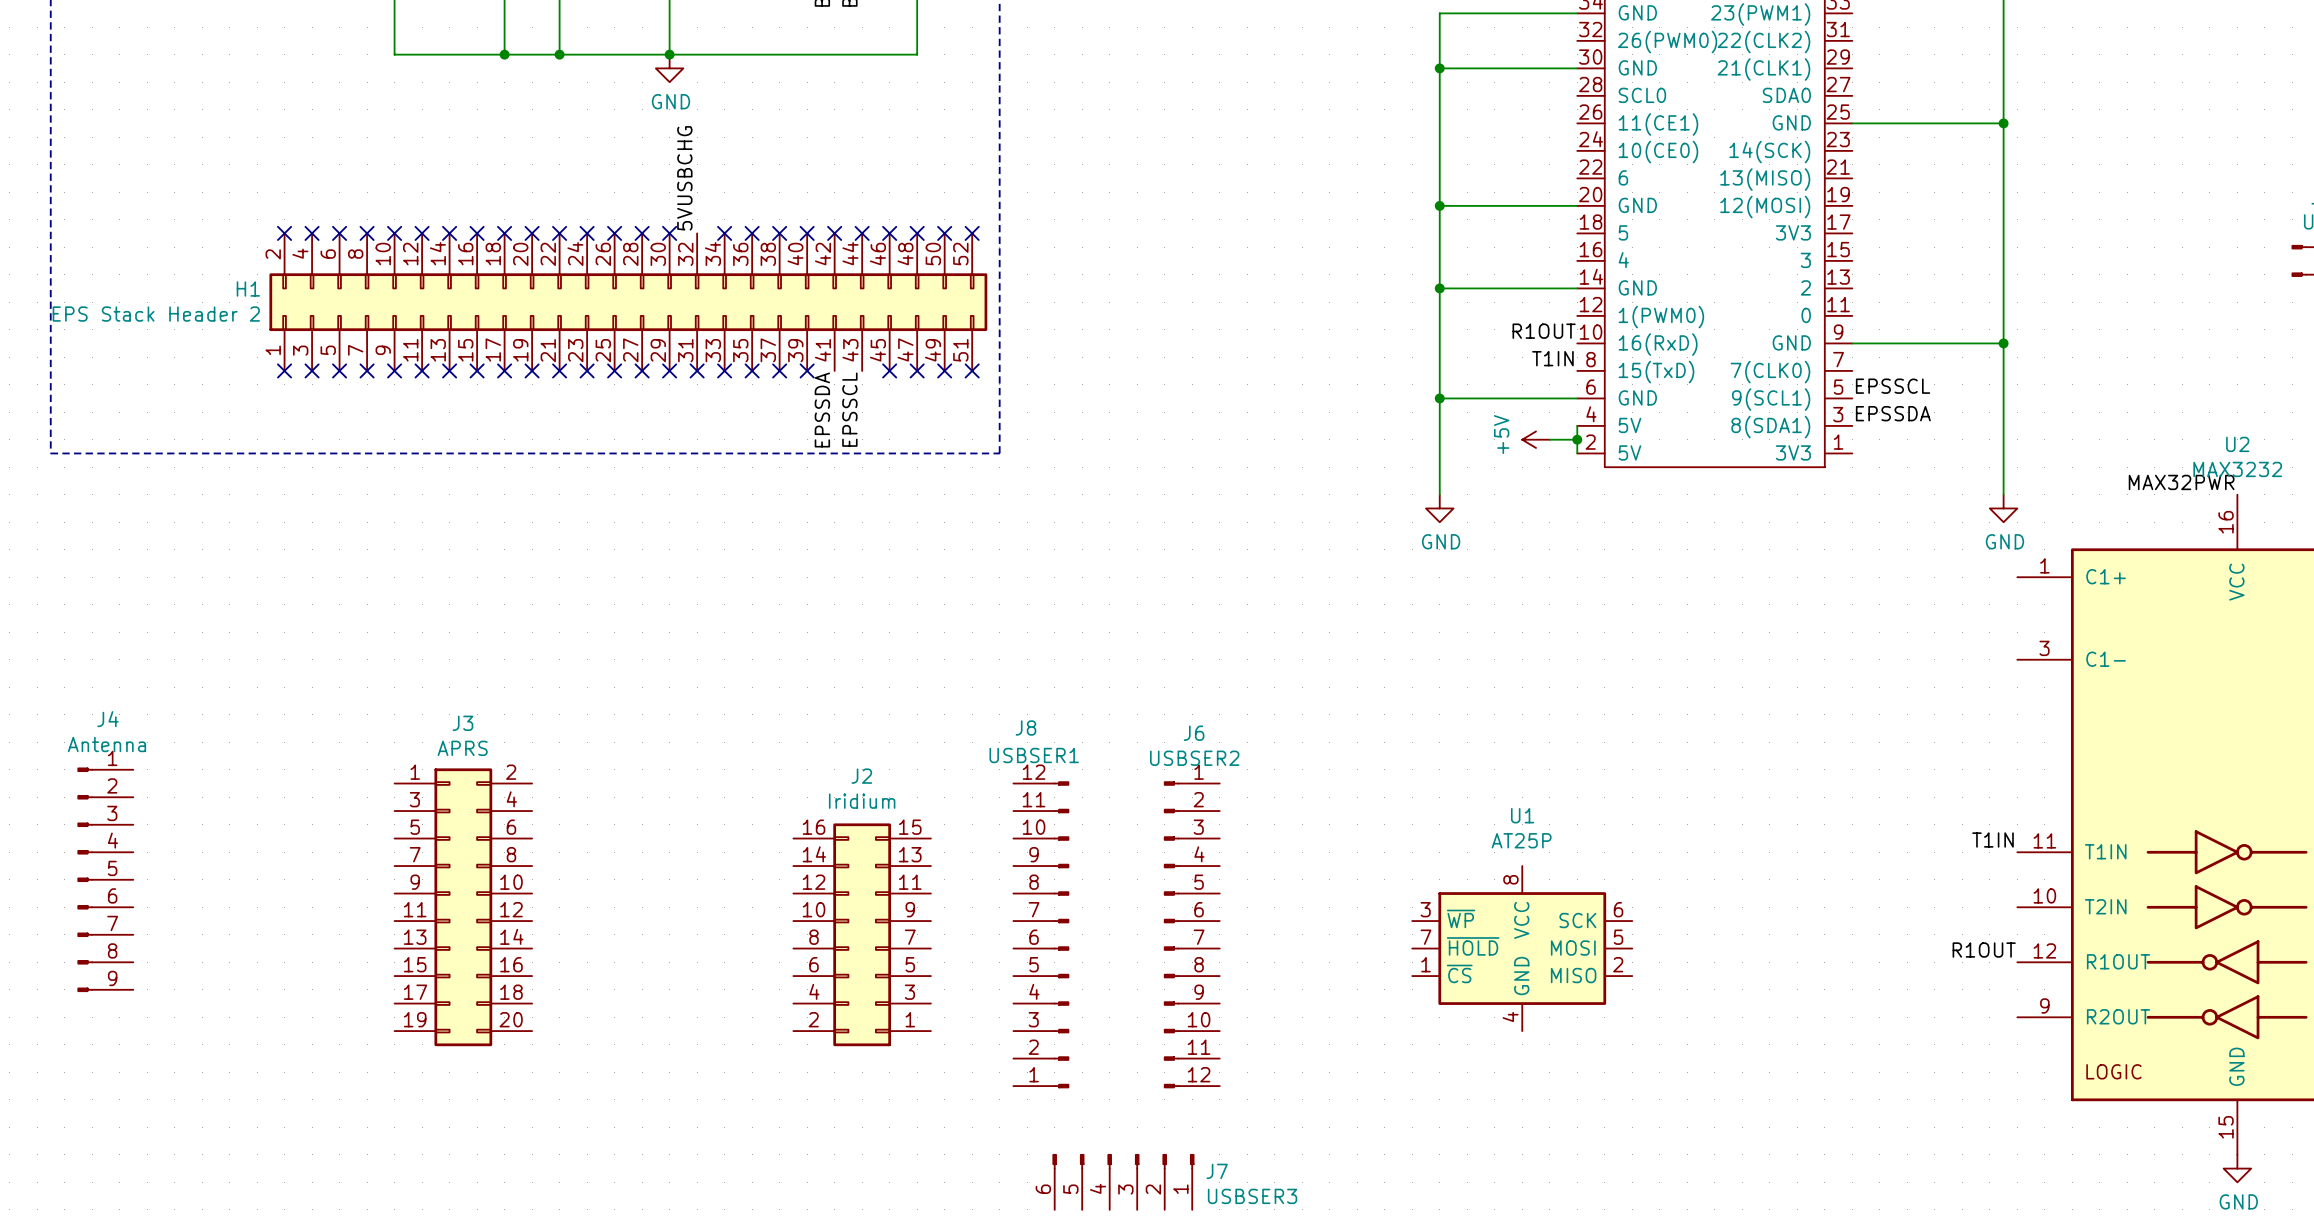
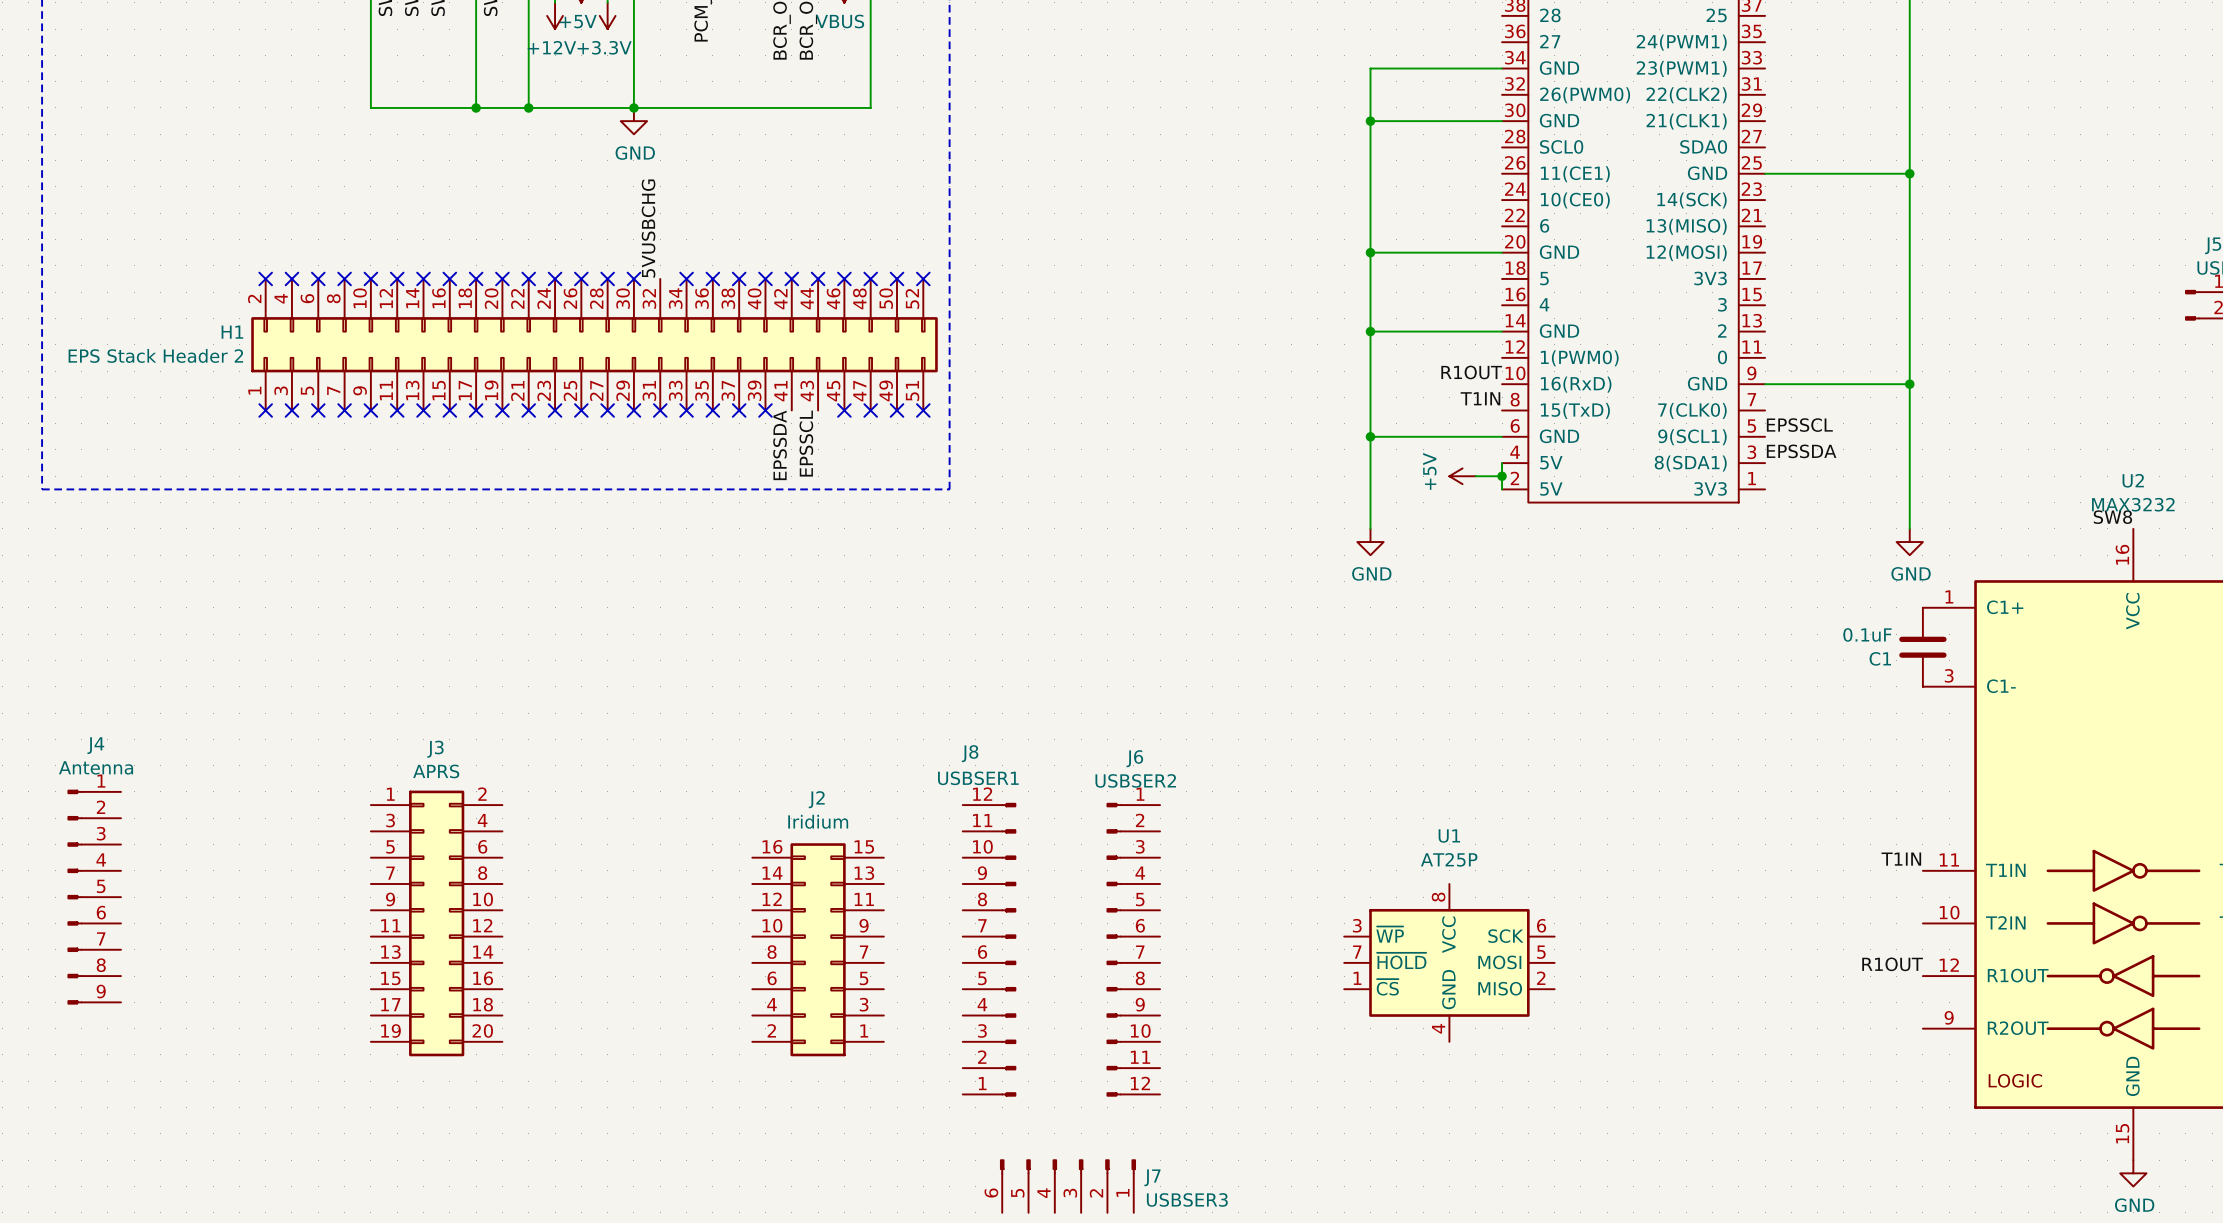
label: MAX32PWR (2181, 482) -> SW8 (2112, 517)
C1: none -> 0.1uF (1922, 647)

